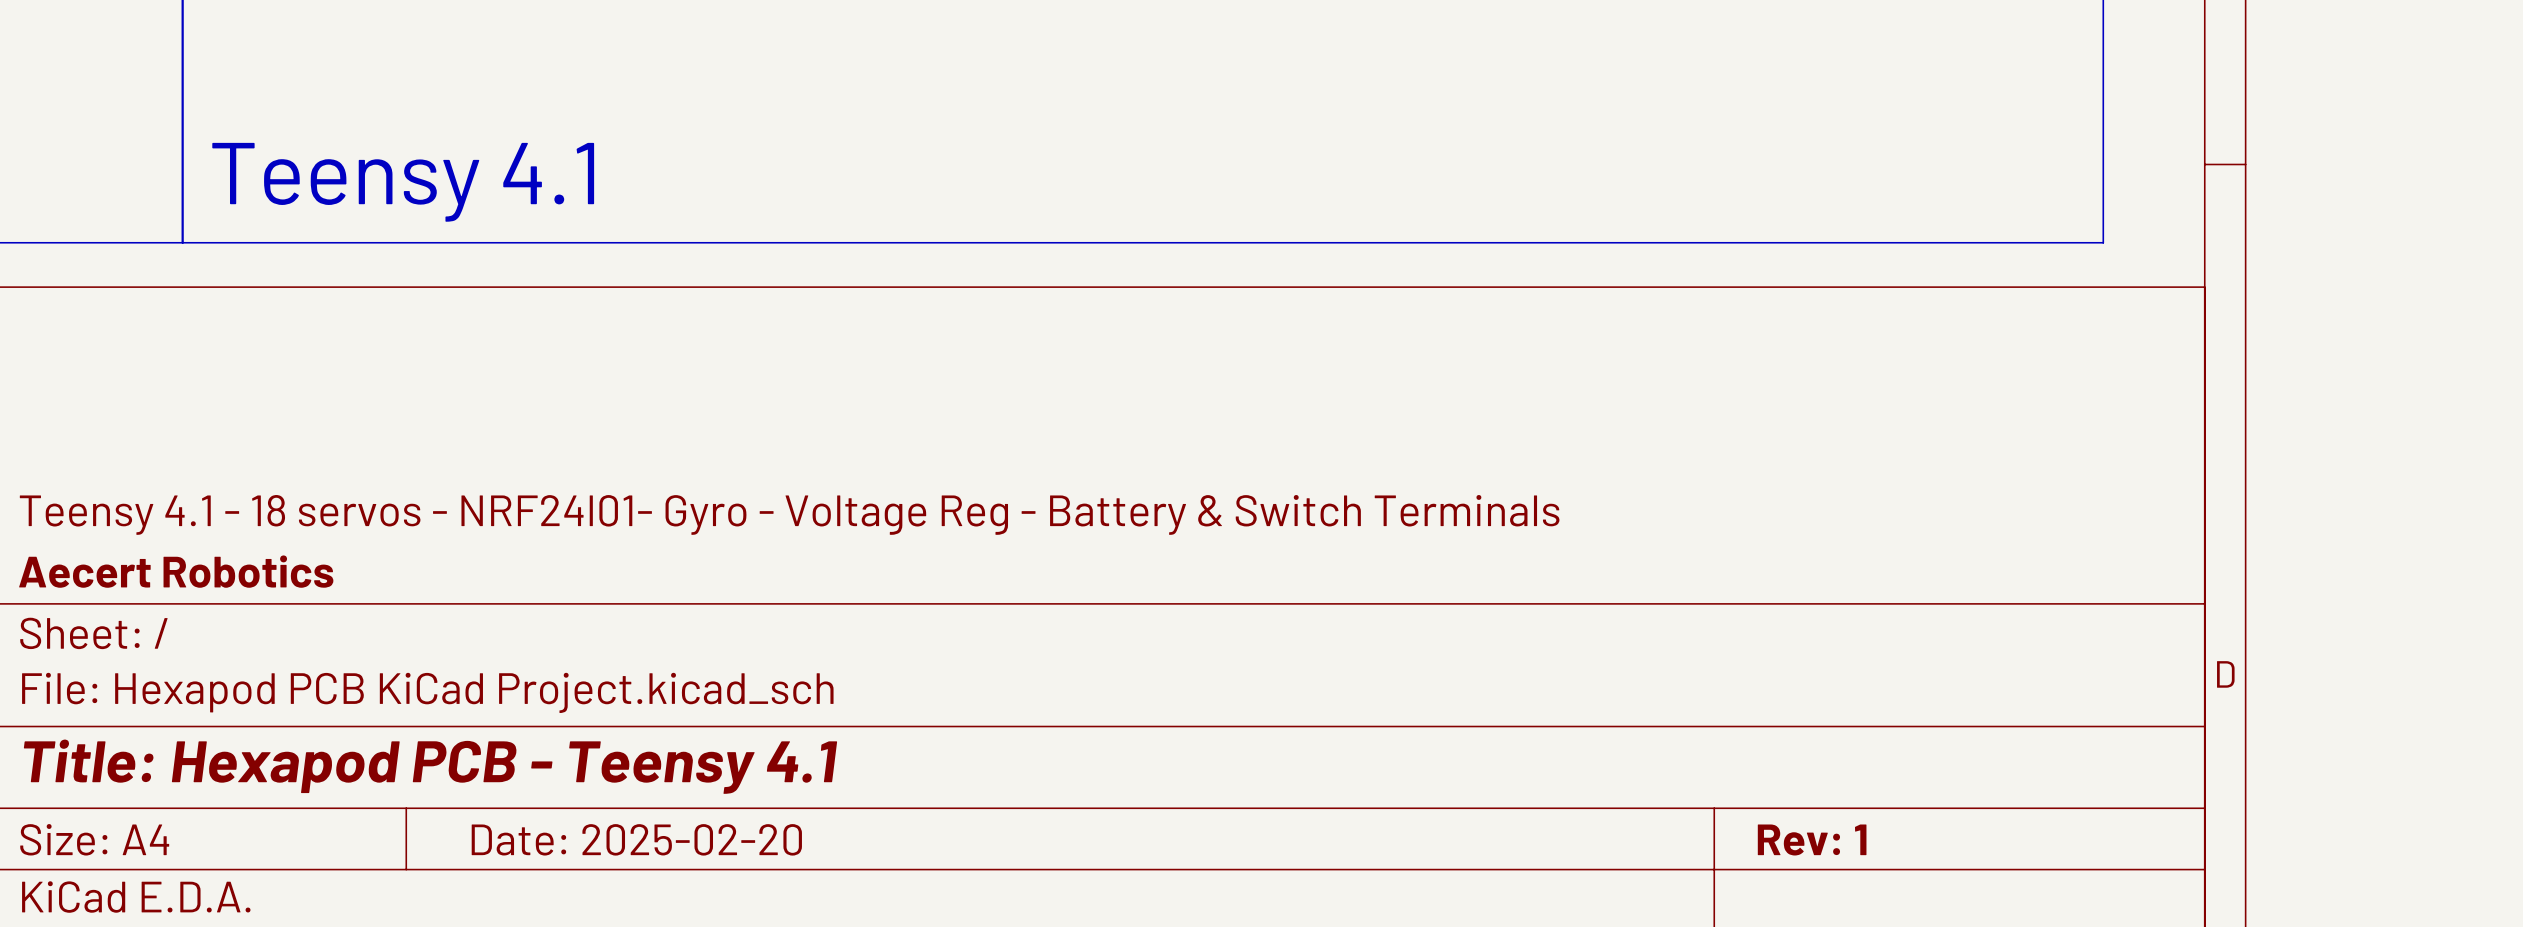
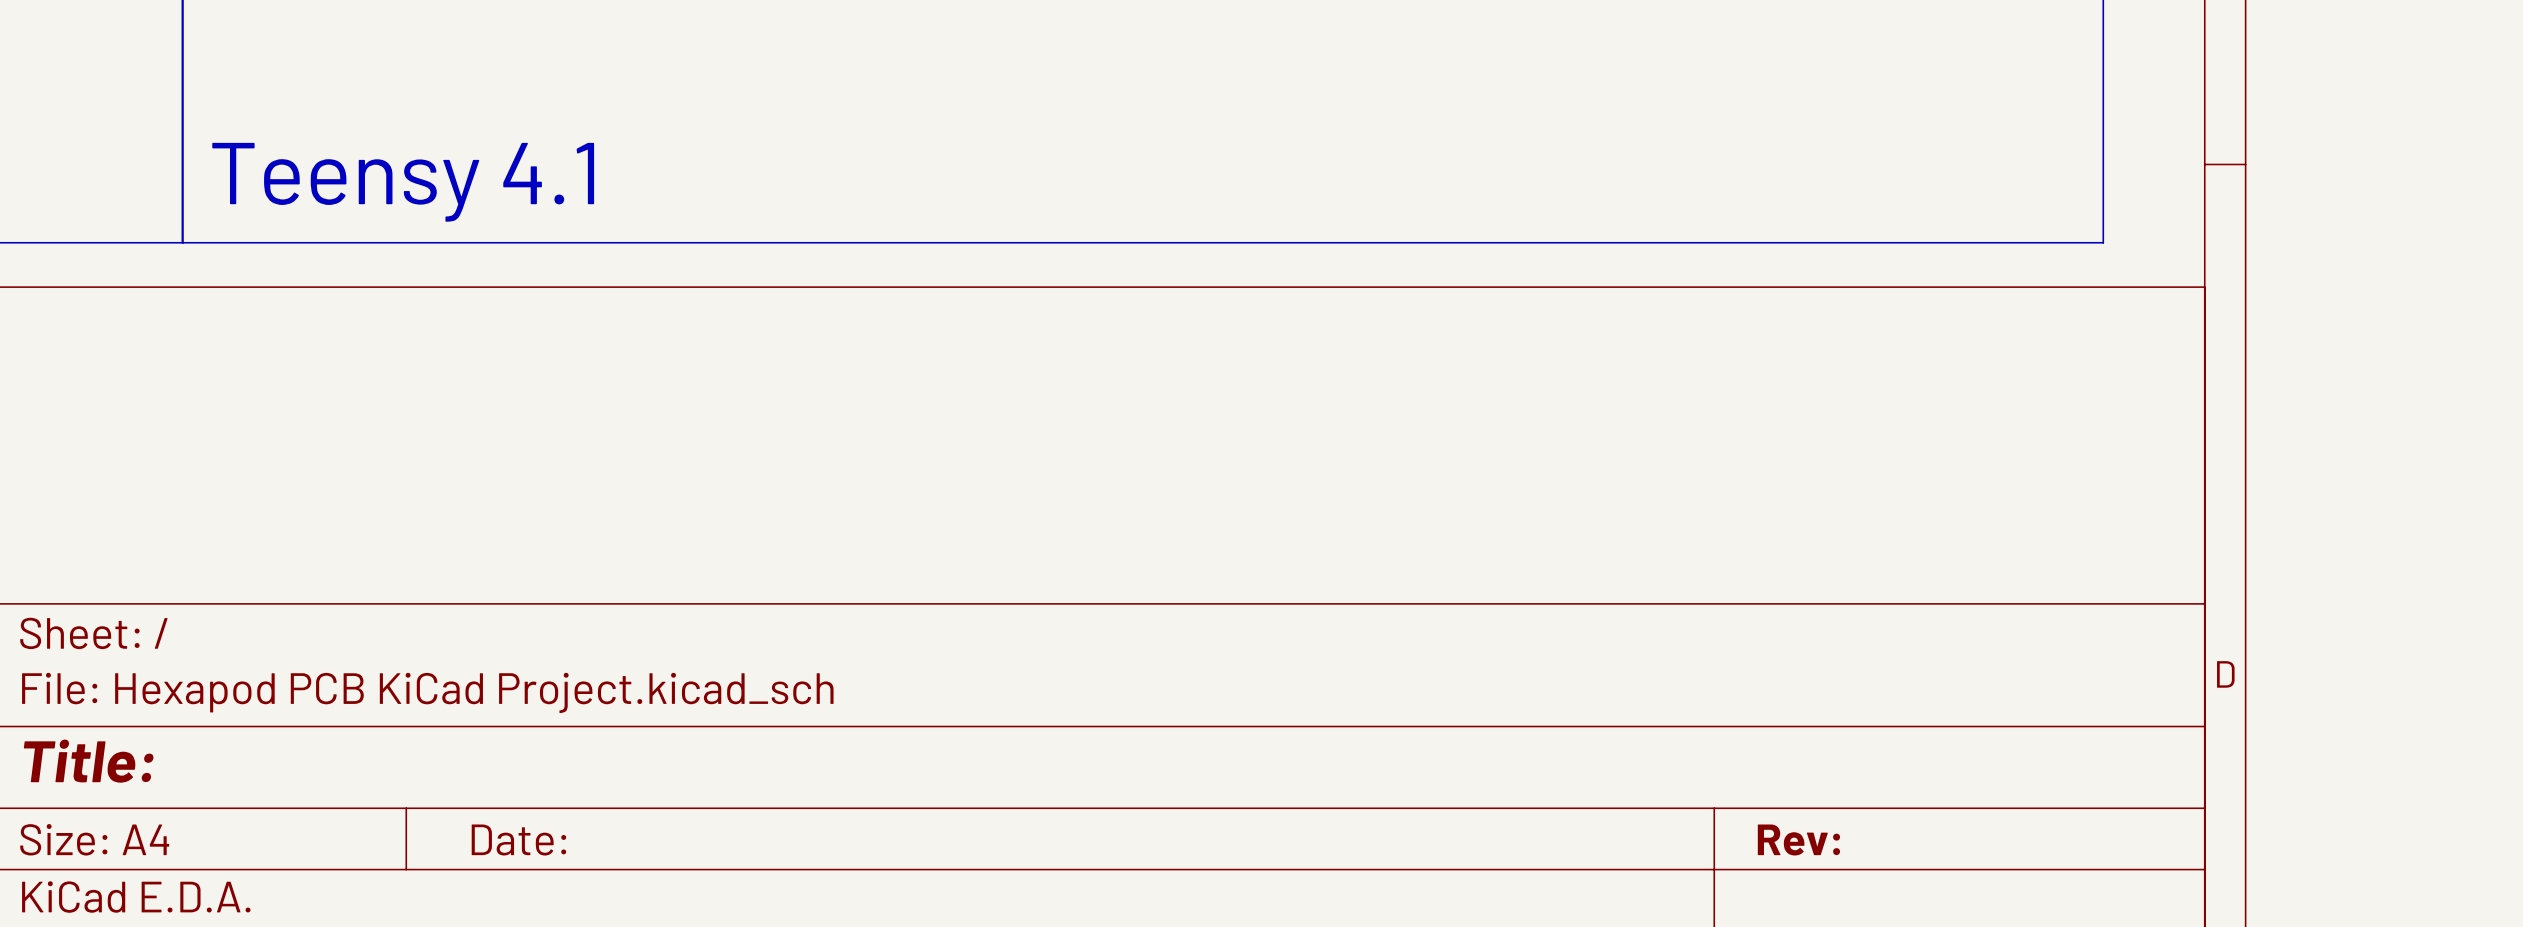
title block: Teensy 4.1 - 18 servos - NRF24l01- Gyro - Voltage Reg - Battery & Switch Terminals (789, 514) -> none
title block: Aecert Robotics (176, 571) -> none
title block: Title: Hexapod PCB - Teensy 4.1 (430, 766) -> Title: (88, 761)
title block: Date: 2025-02-20 (636, 839) -> Date: (518, 840)
title block: Rev: 1 (1812, 839) -> Rev: (1798, 839)

